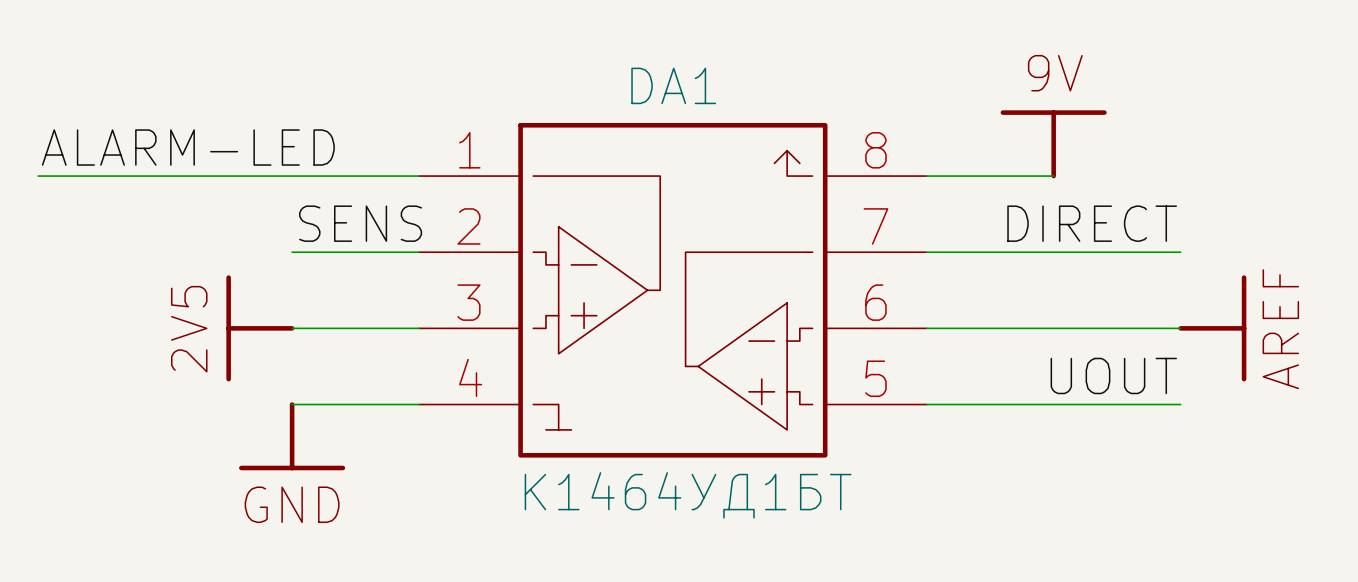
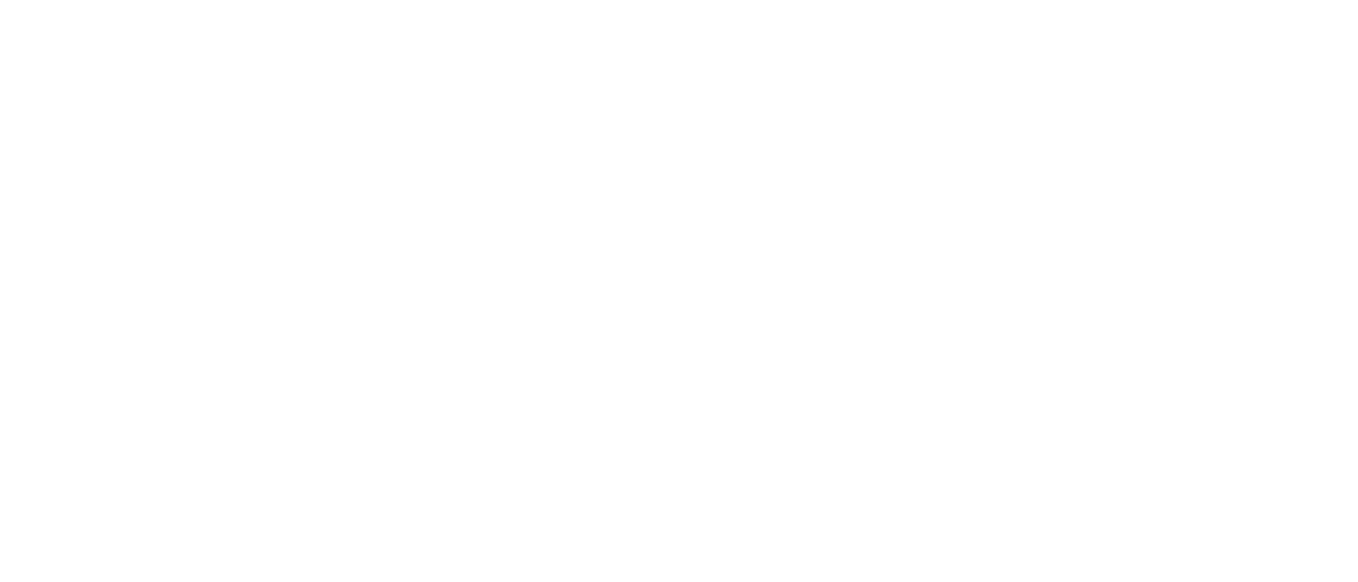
power symbol: (1053, 144) -> none
label: ALARM-LED (188, 147) -> none
wire: (38, 176) (419, 176) -> none
wire: (926, 176) (1053, 176) -> none
label: SENS (360, 223) -> none
label: DIRECT (1092, 223) -> none
wire: (292, 252) (419, 252) -> none
wire: (926, 252) (1180, 252) -> none
DA1: (672, 290) -> none
power symbol: (260, 328) -> none
wire: (292, 328) (419, 328) -> none
wire: (926, 328) (1180, 328) -> none
power symbol: (1212, 328) -> none
label: UOUT (1113, 375) -> none
wire: (292, 404) (419, 404) -> none
wire: (926, 404) (1180, 404) -> none
power symbol: (292, 436) -> none

